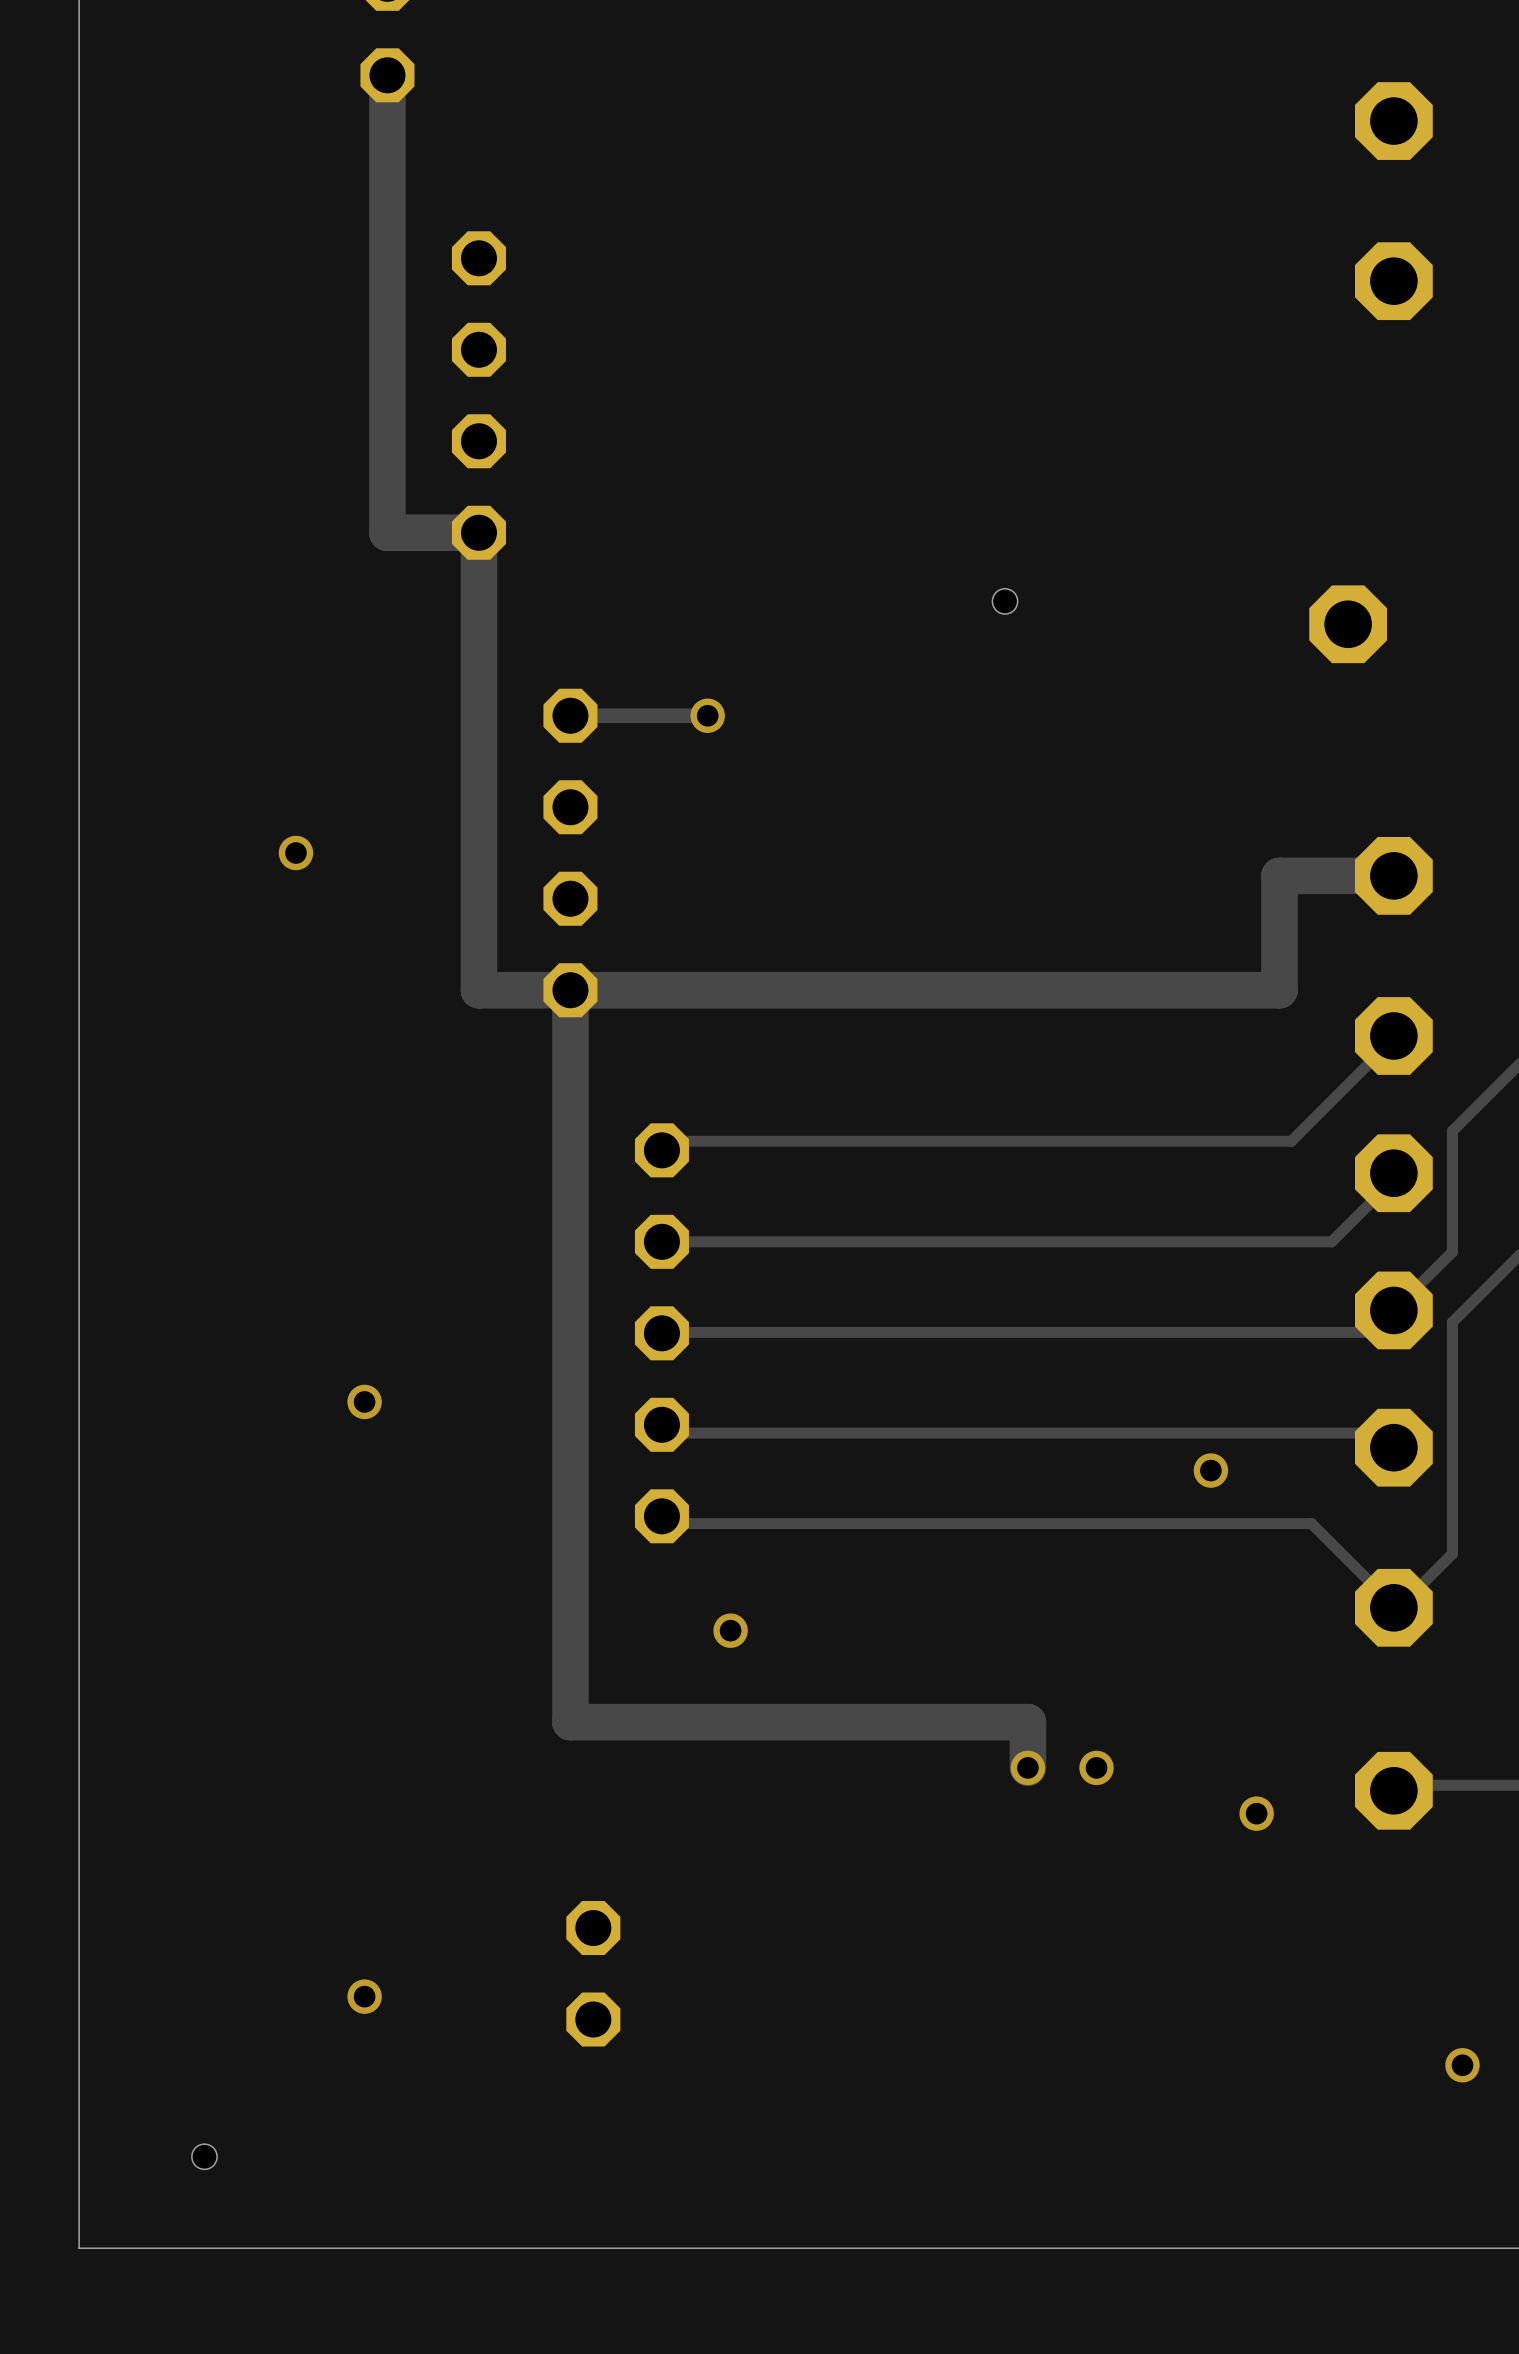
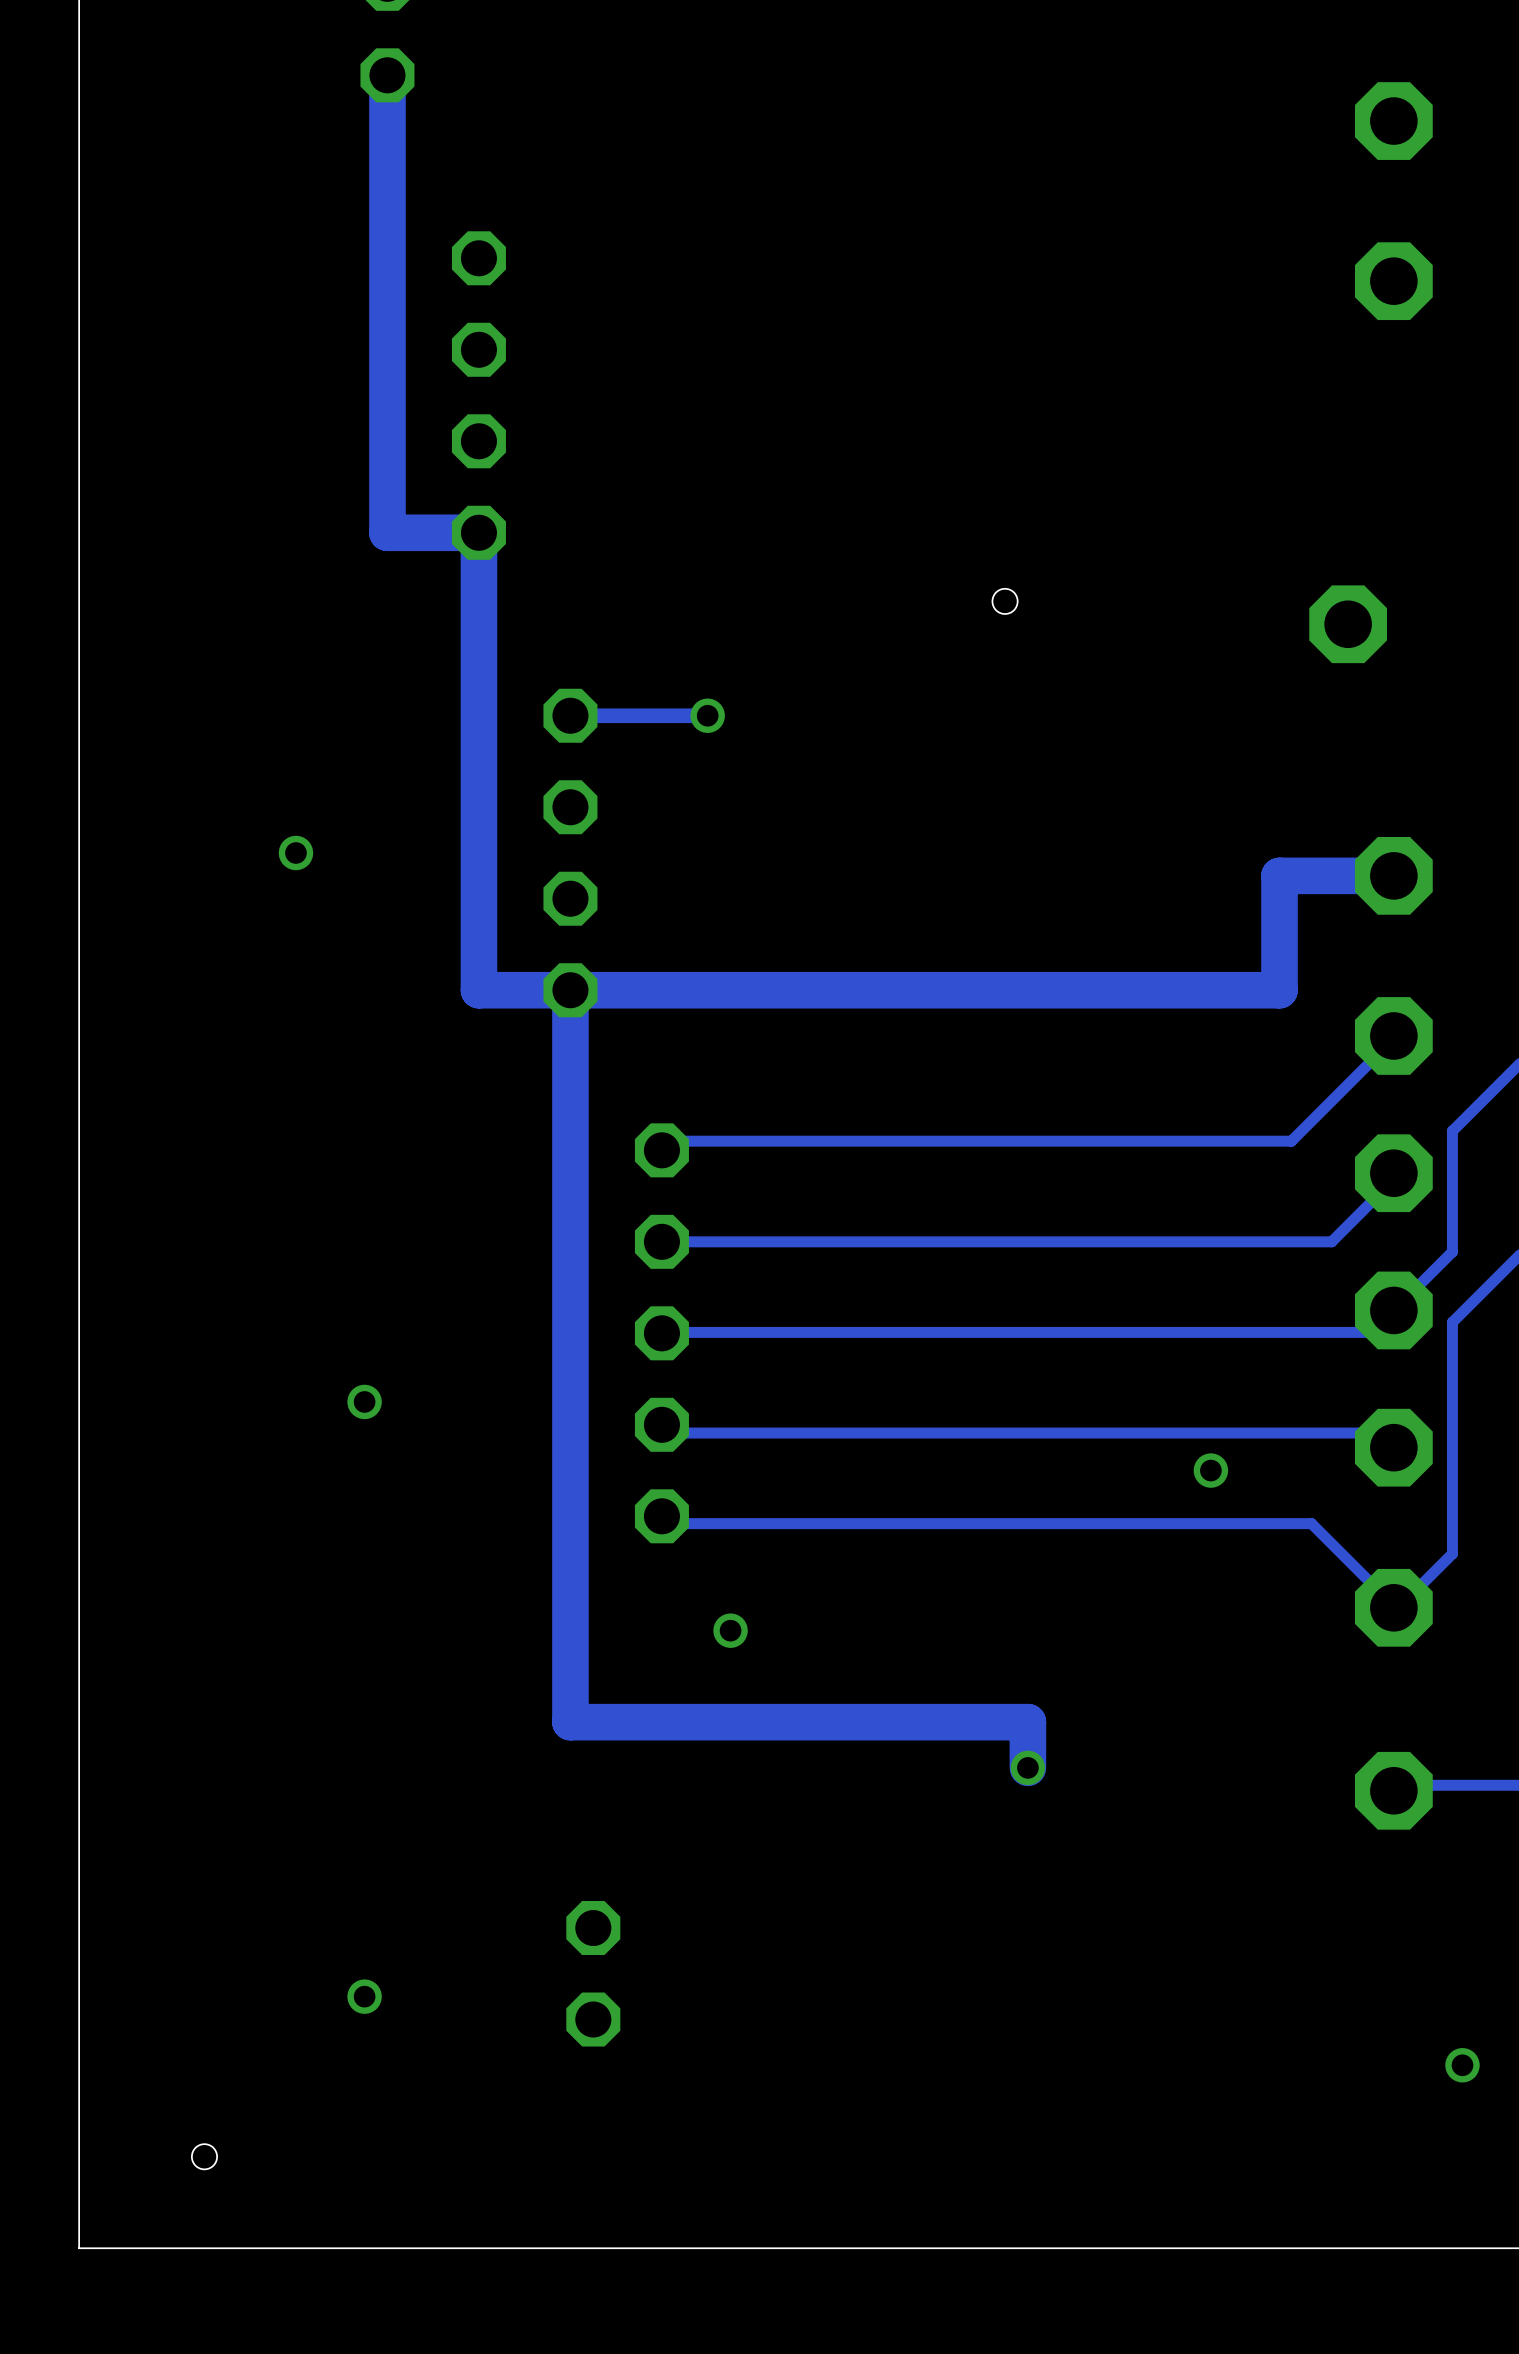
via: (1096, 1767) -> none
via: (1256, 1813) -> none

